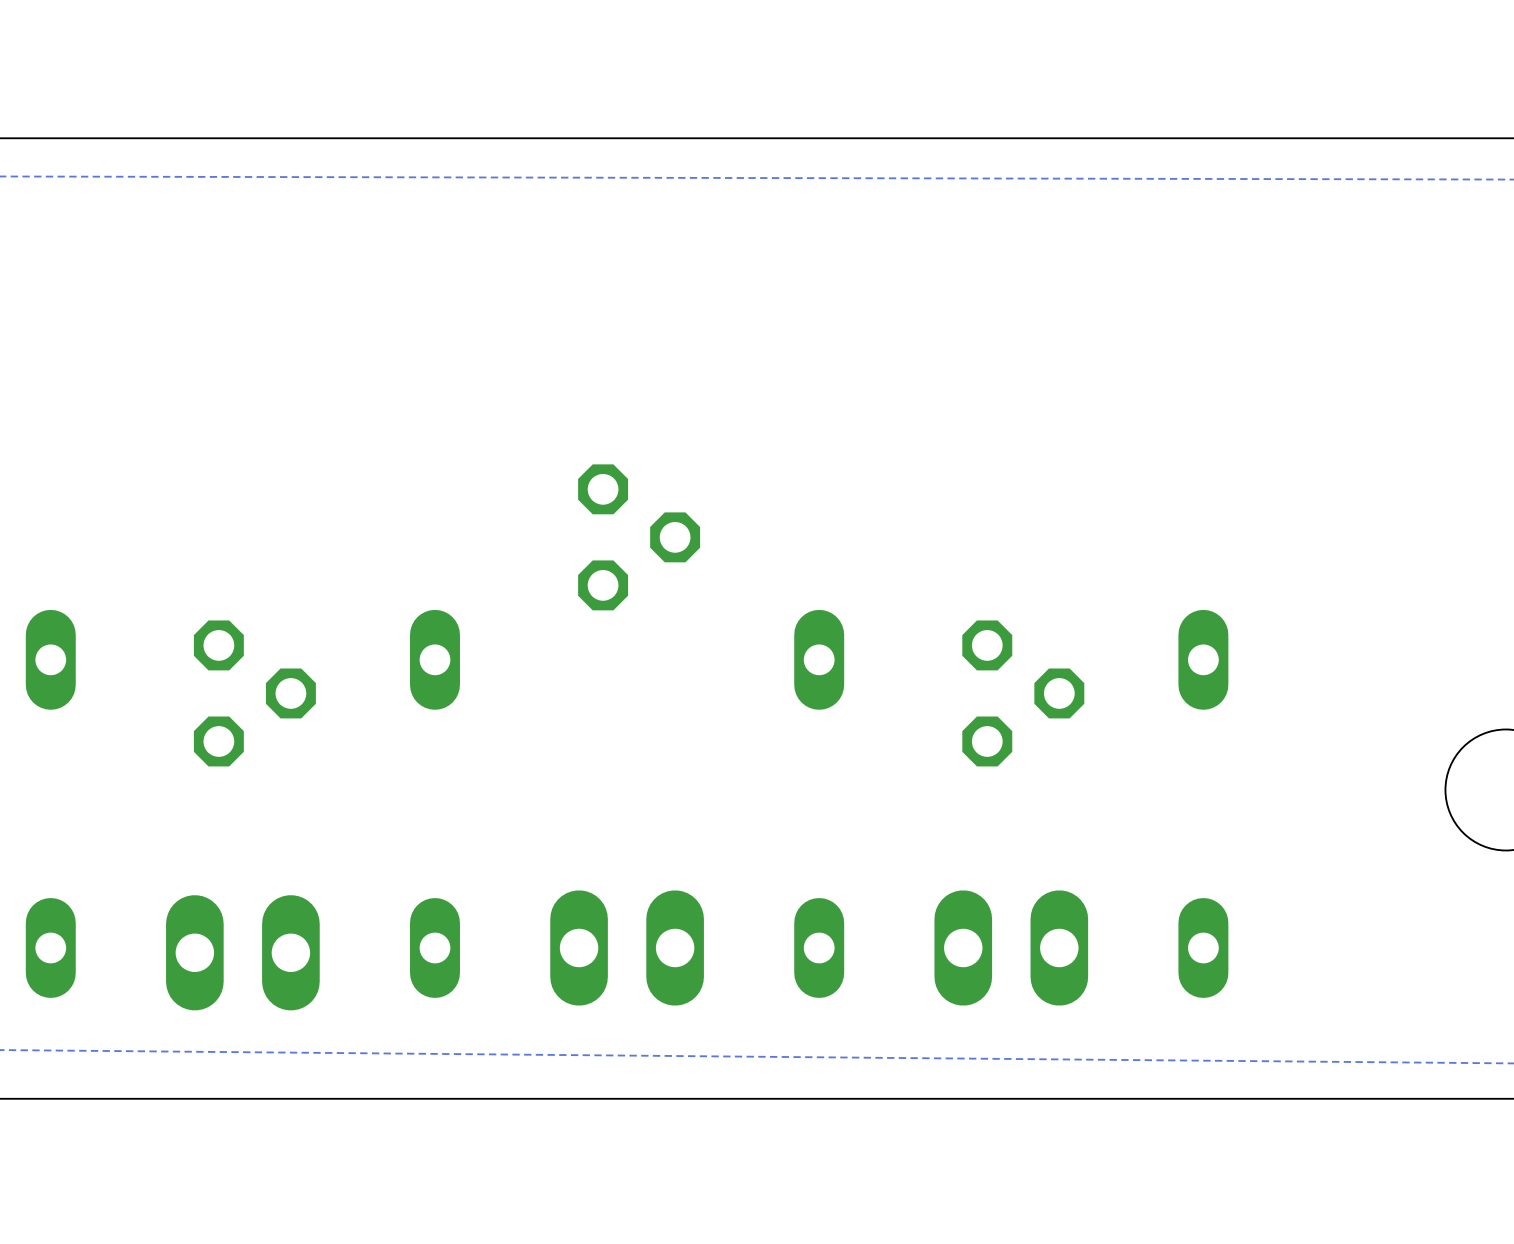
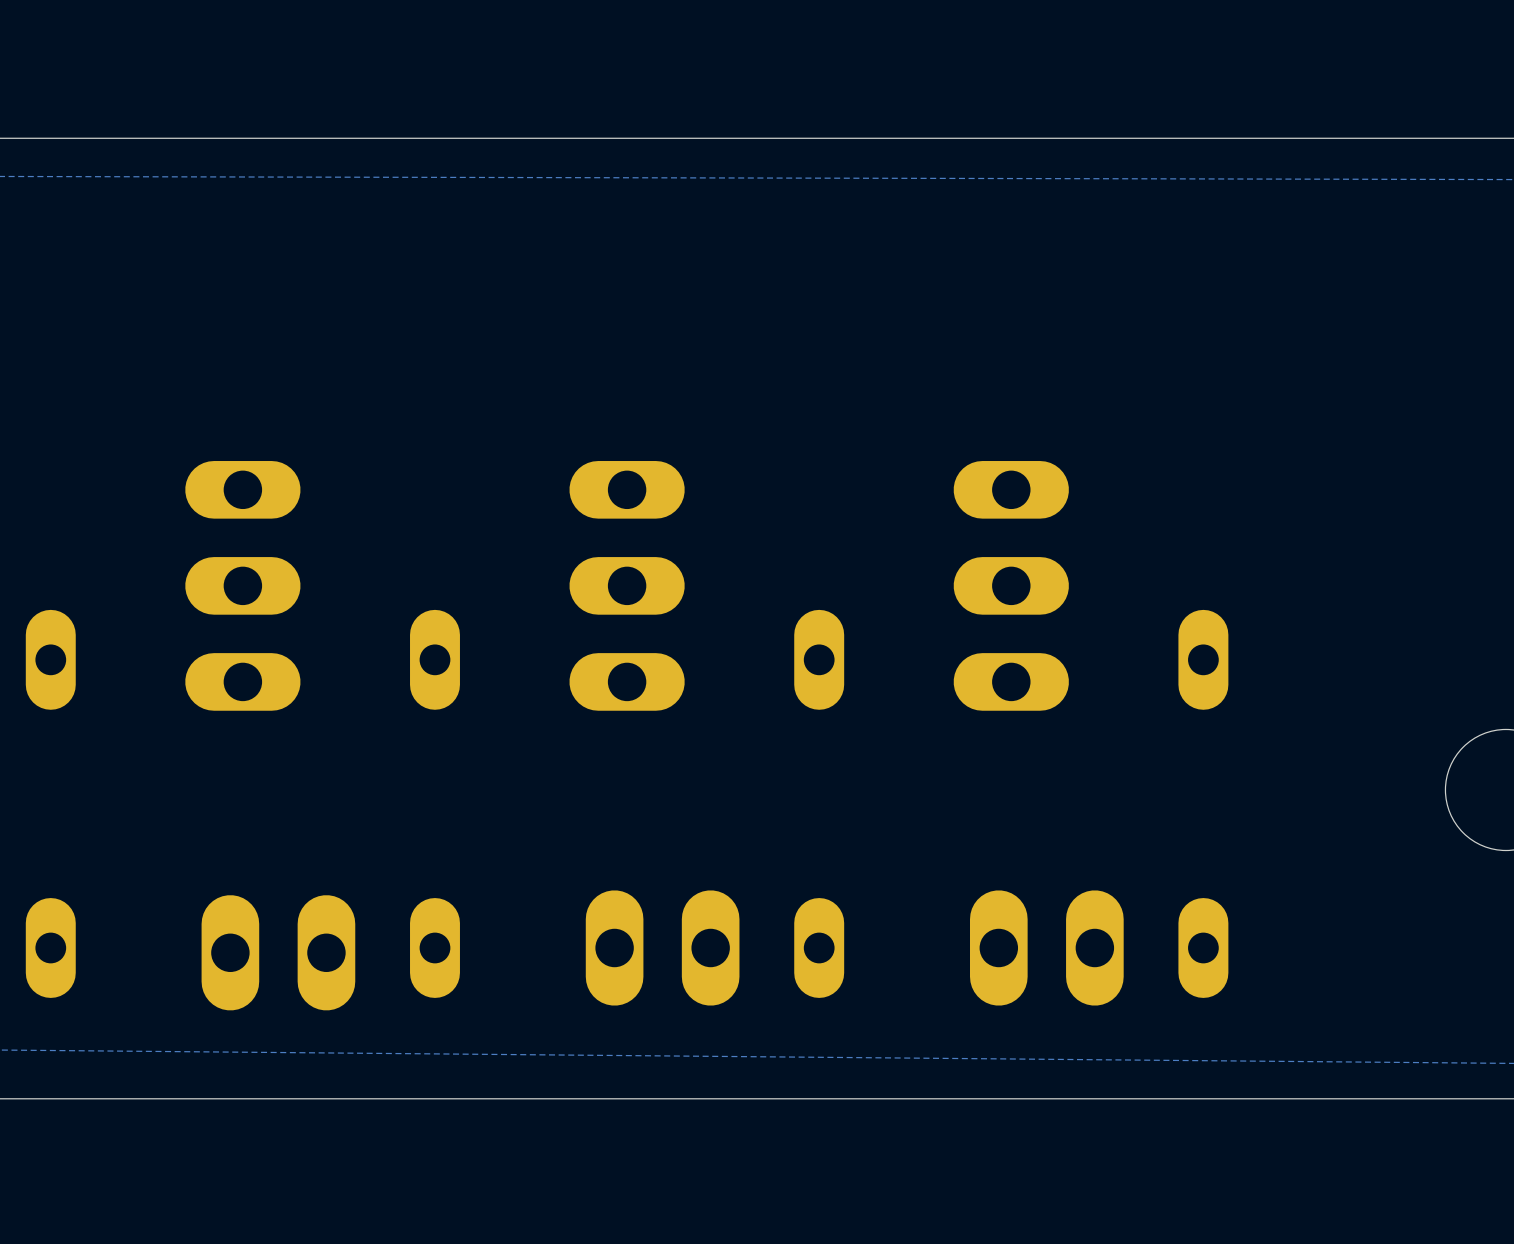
part: (639, 537) -> none
part: none -> (242, 585)
part: none -> (627, 585)
part: none -> (1011, 585)
part: (254, 693) -> none
part: (1023, 693) -> none
part position: (627, 947) -> (662, 947)
part position: (1011, 947) -> (1046, 947)
part position: (242, 952) -> (278, 952)

